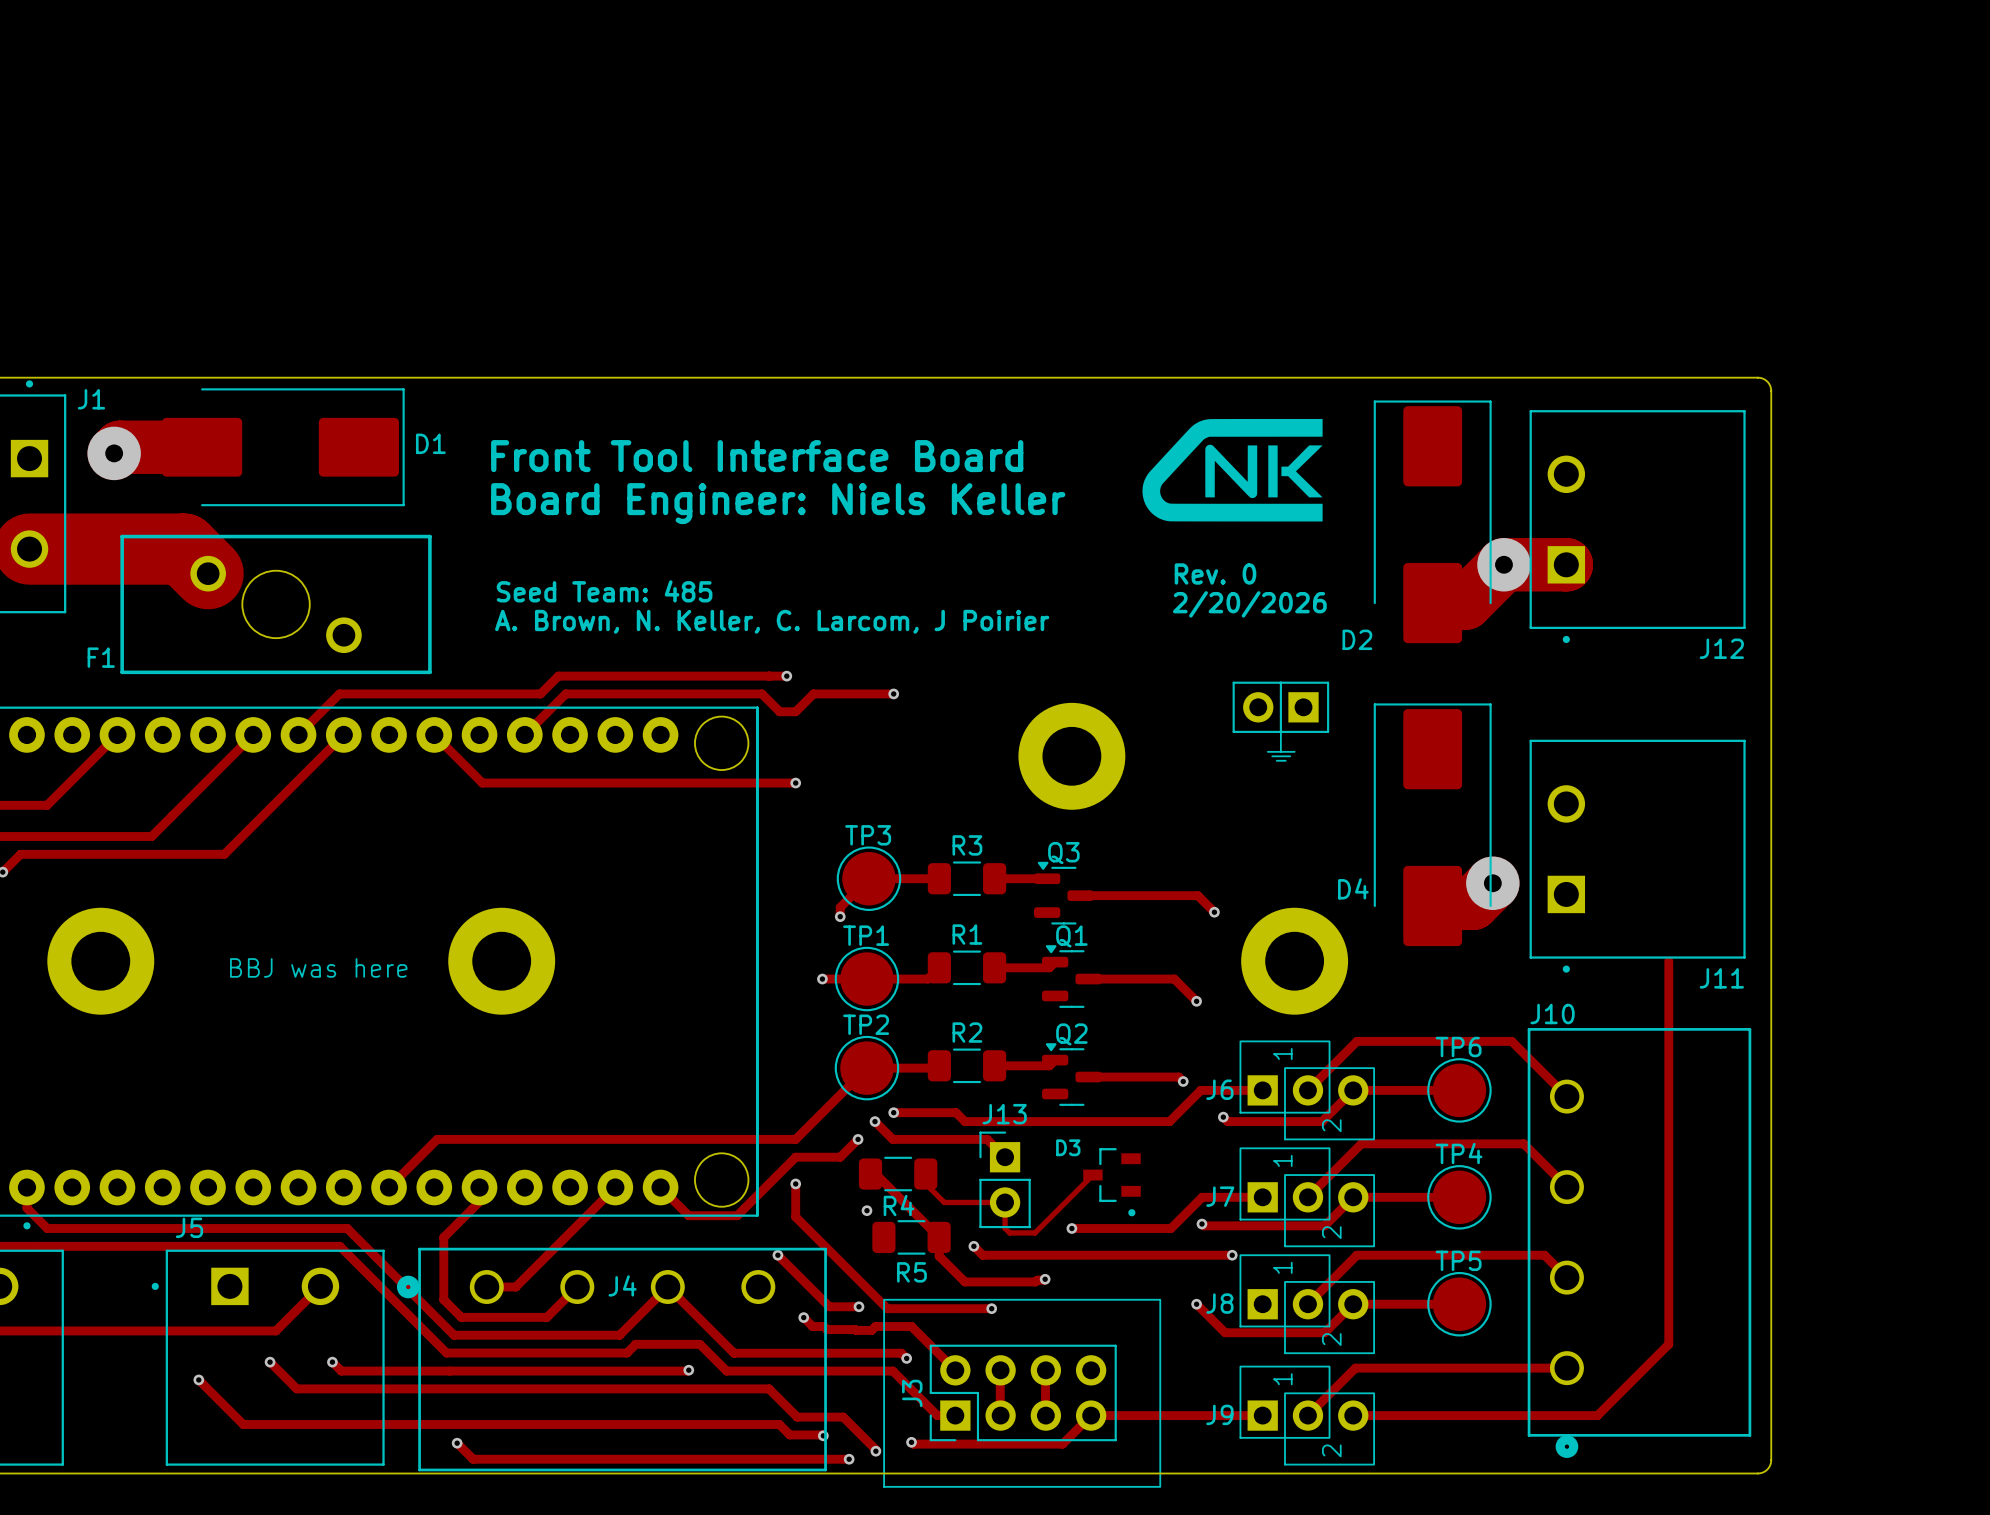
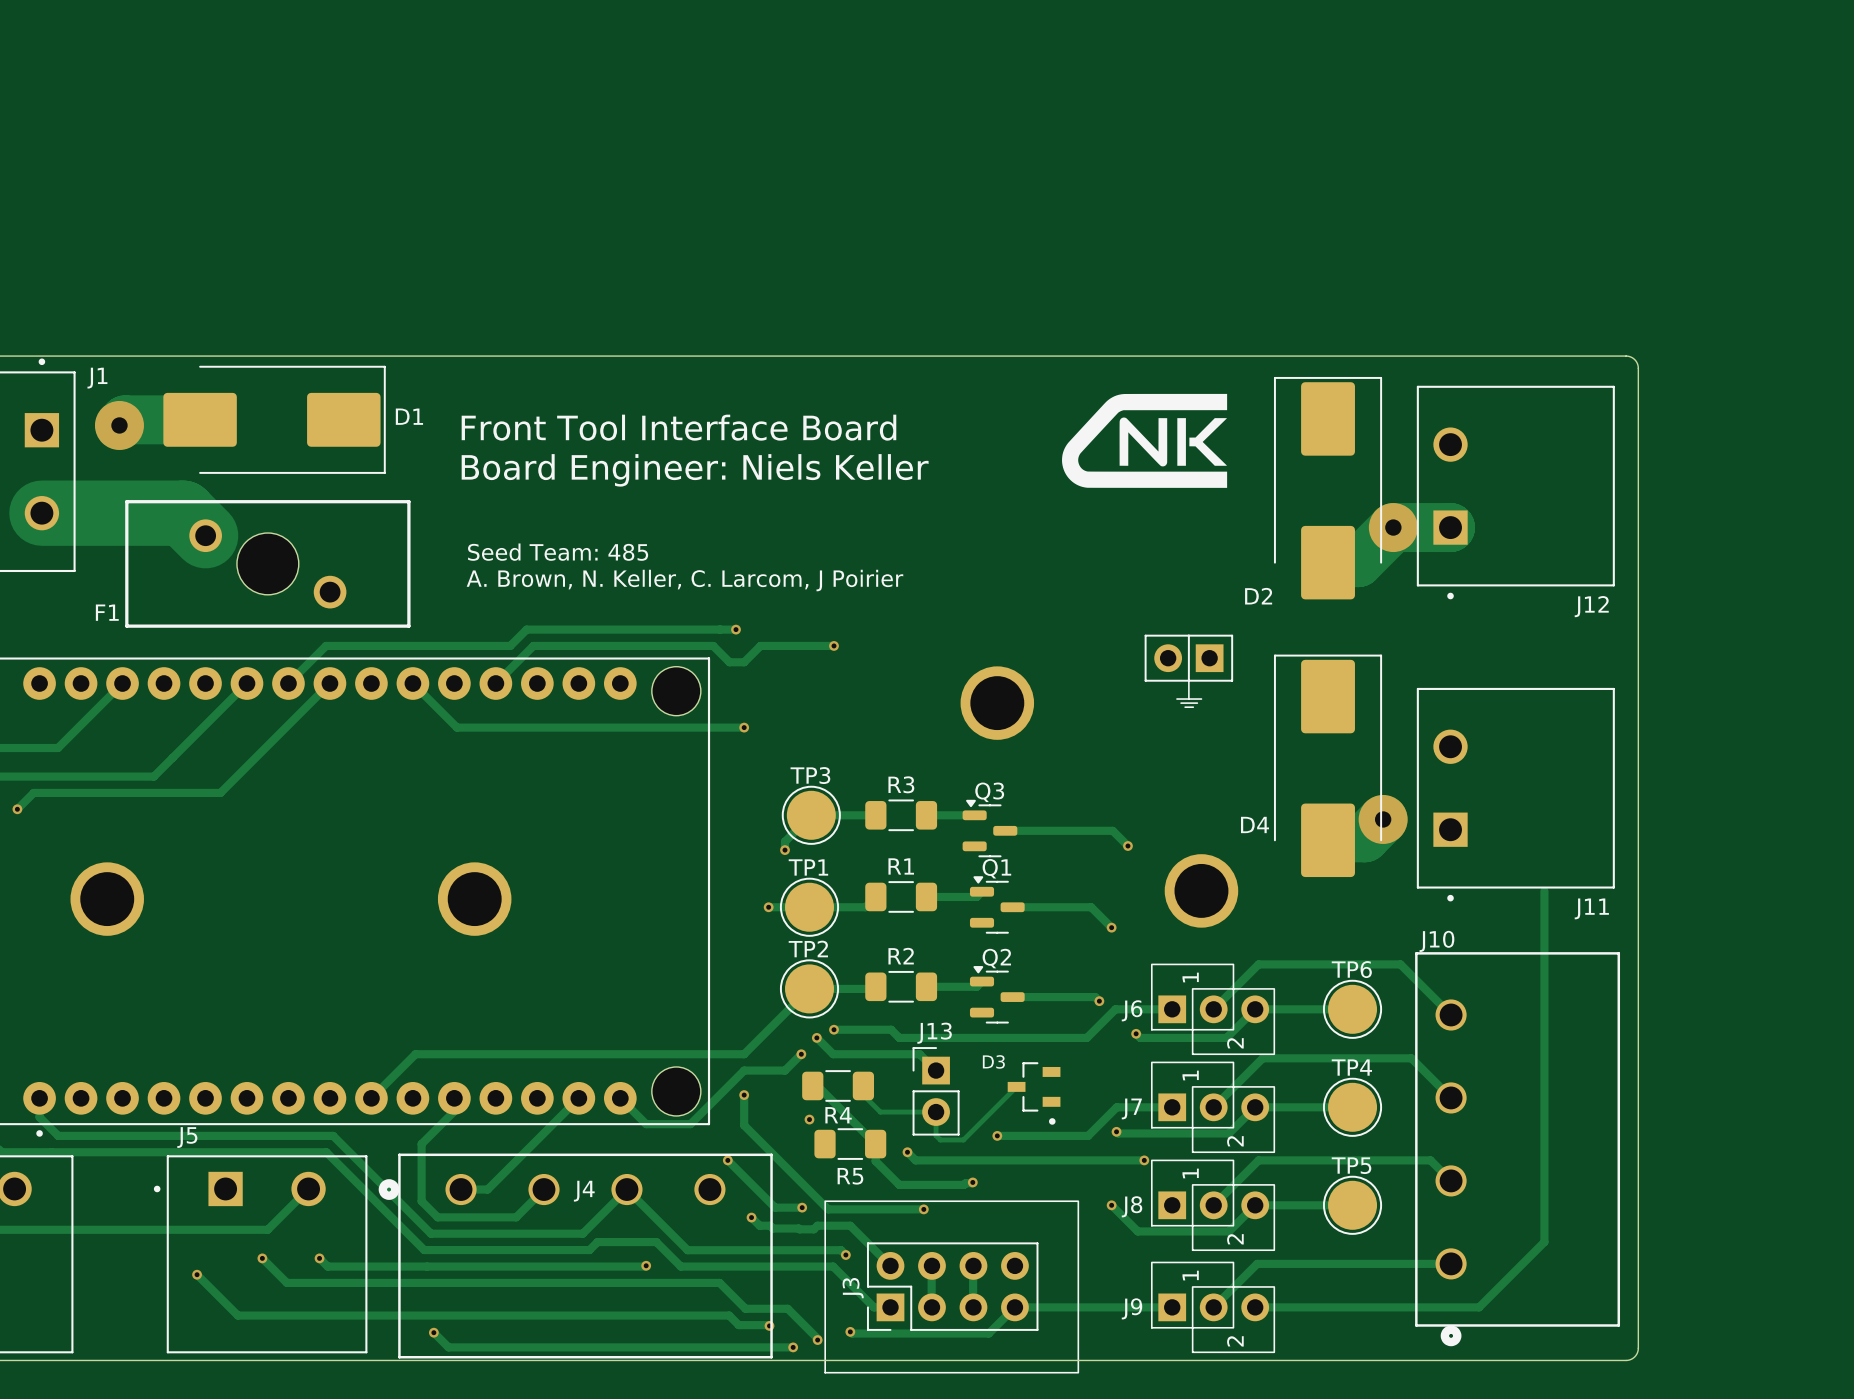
text: Rev. 0 (1215, 573) -> none
text: 2/20/2026 (1249, 604) -> none
part footprint: [1018, 702, 1126, 810] -> [960, 666, 1035, 740]
part footprint: [47, 907, 155, 1015] -> [70, 862, 144, 936]
part footprint: [448, 907, 556, 1015] -> [437, 862, 512, 936]
part footprint: [1241, 907, 1349, 1015] -> [1164, 854, 1239, 928]
text: BBJ was here (318, 967) -> none

